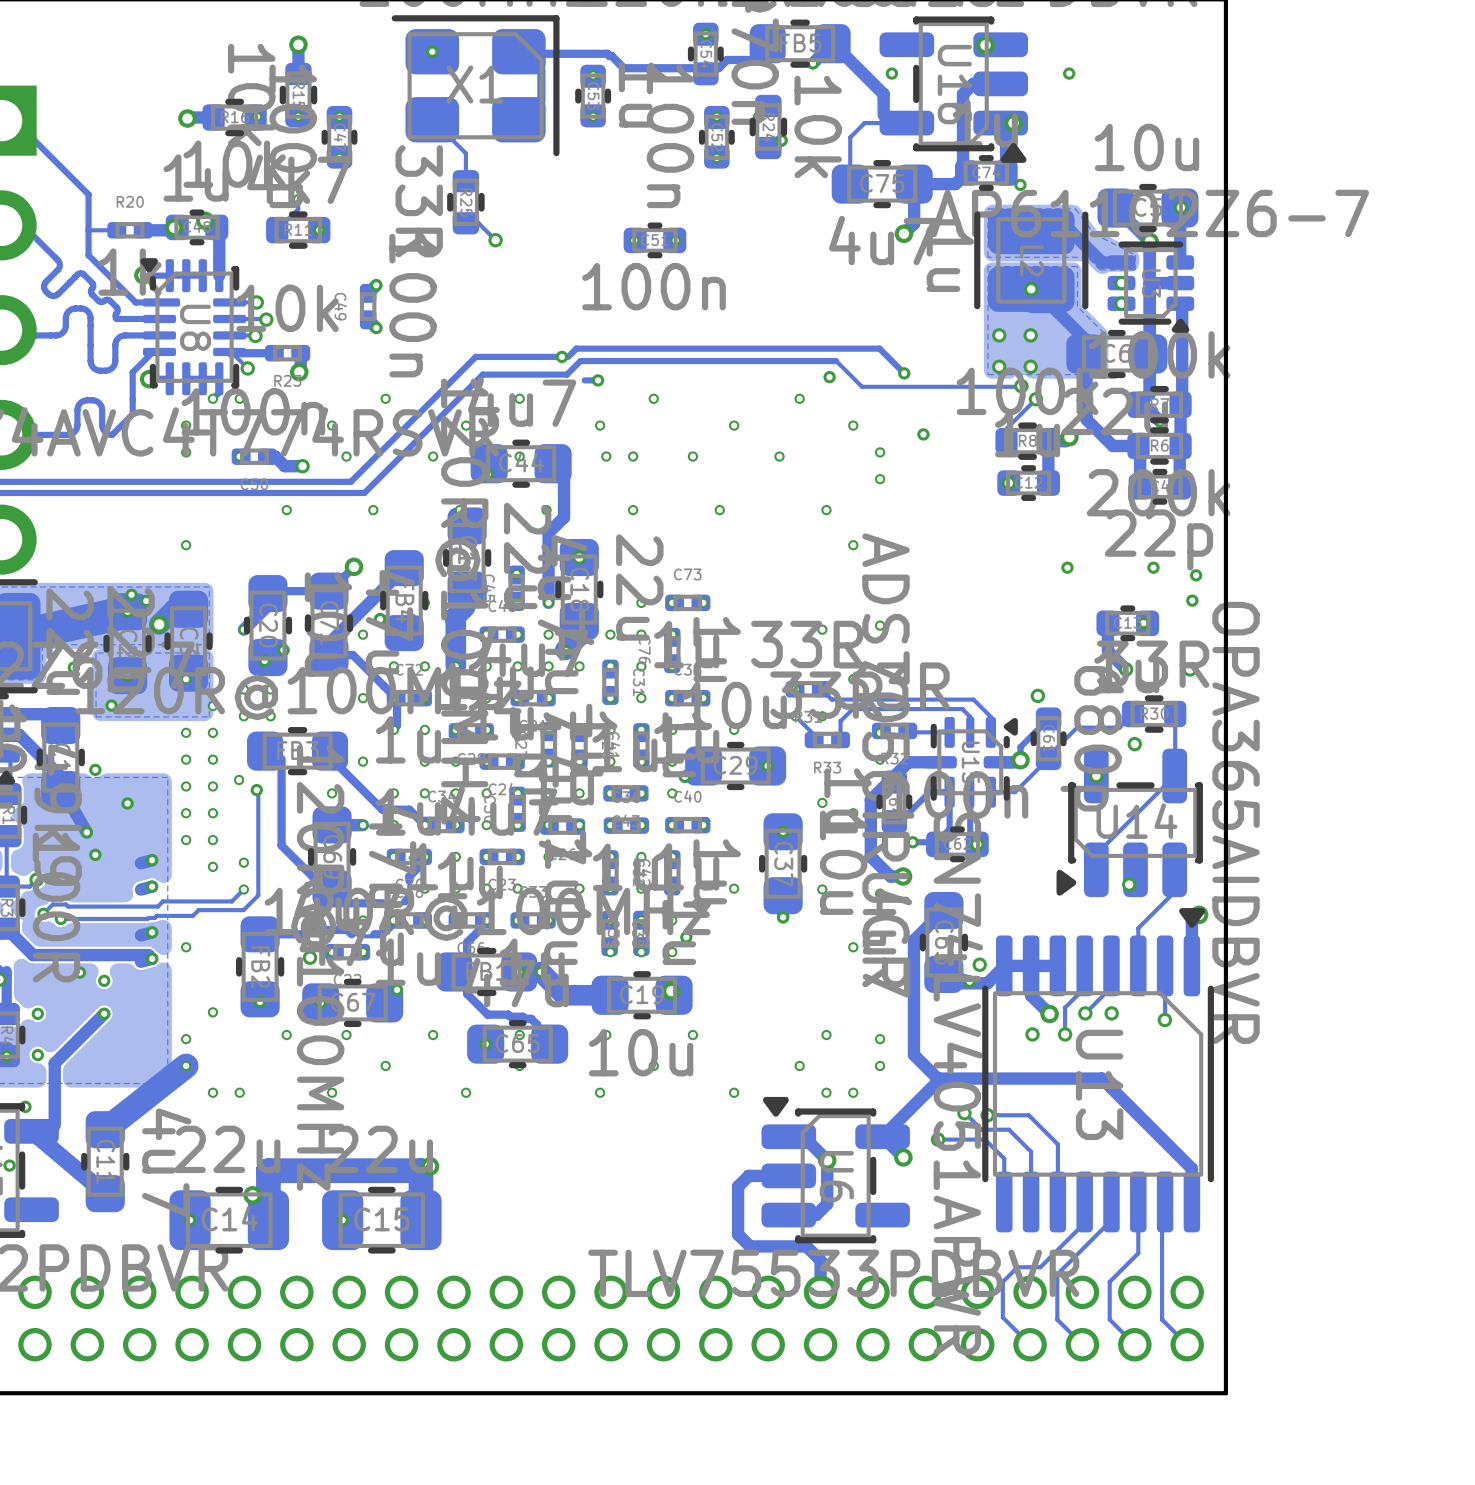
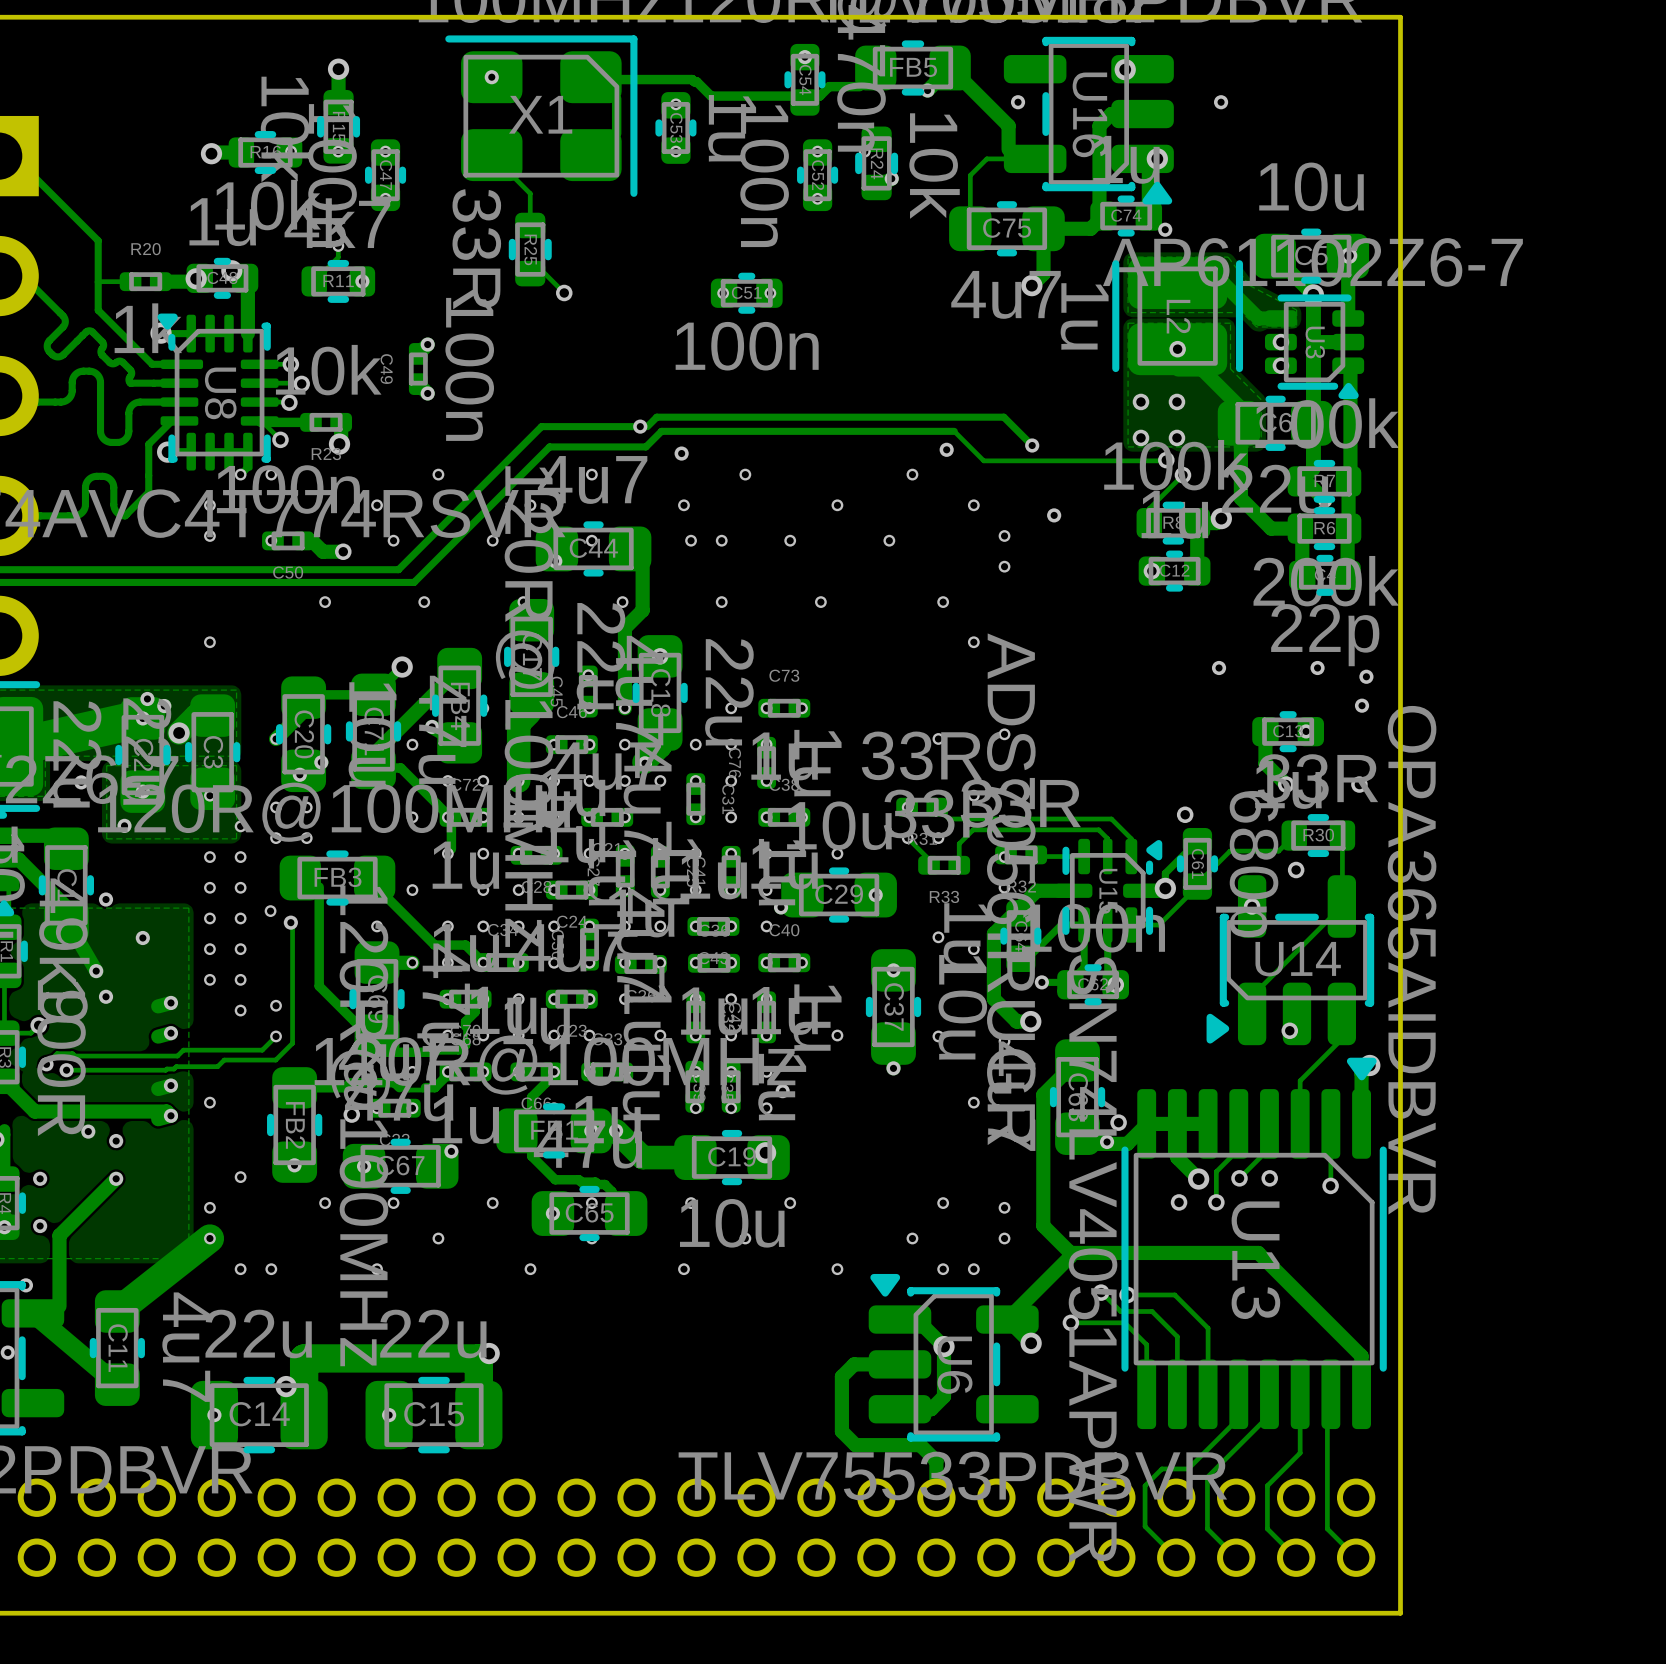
track: (598, 380) (584, 380) -> none

